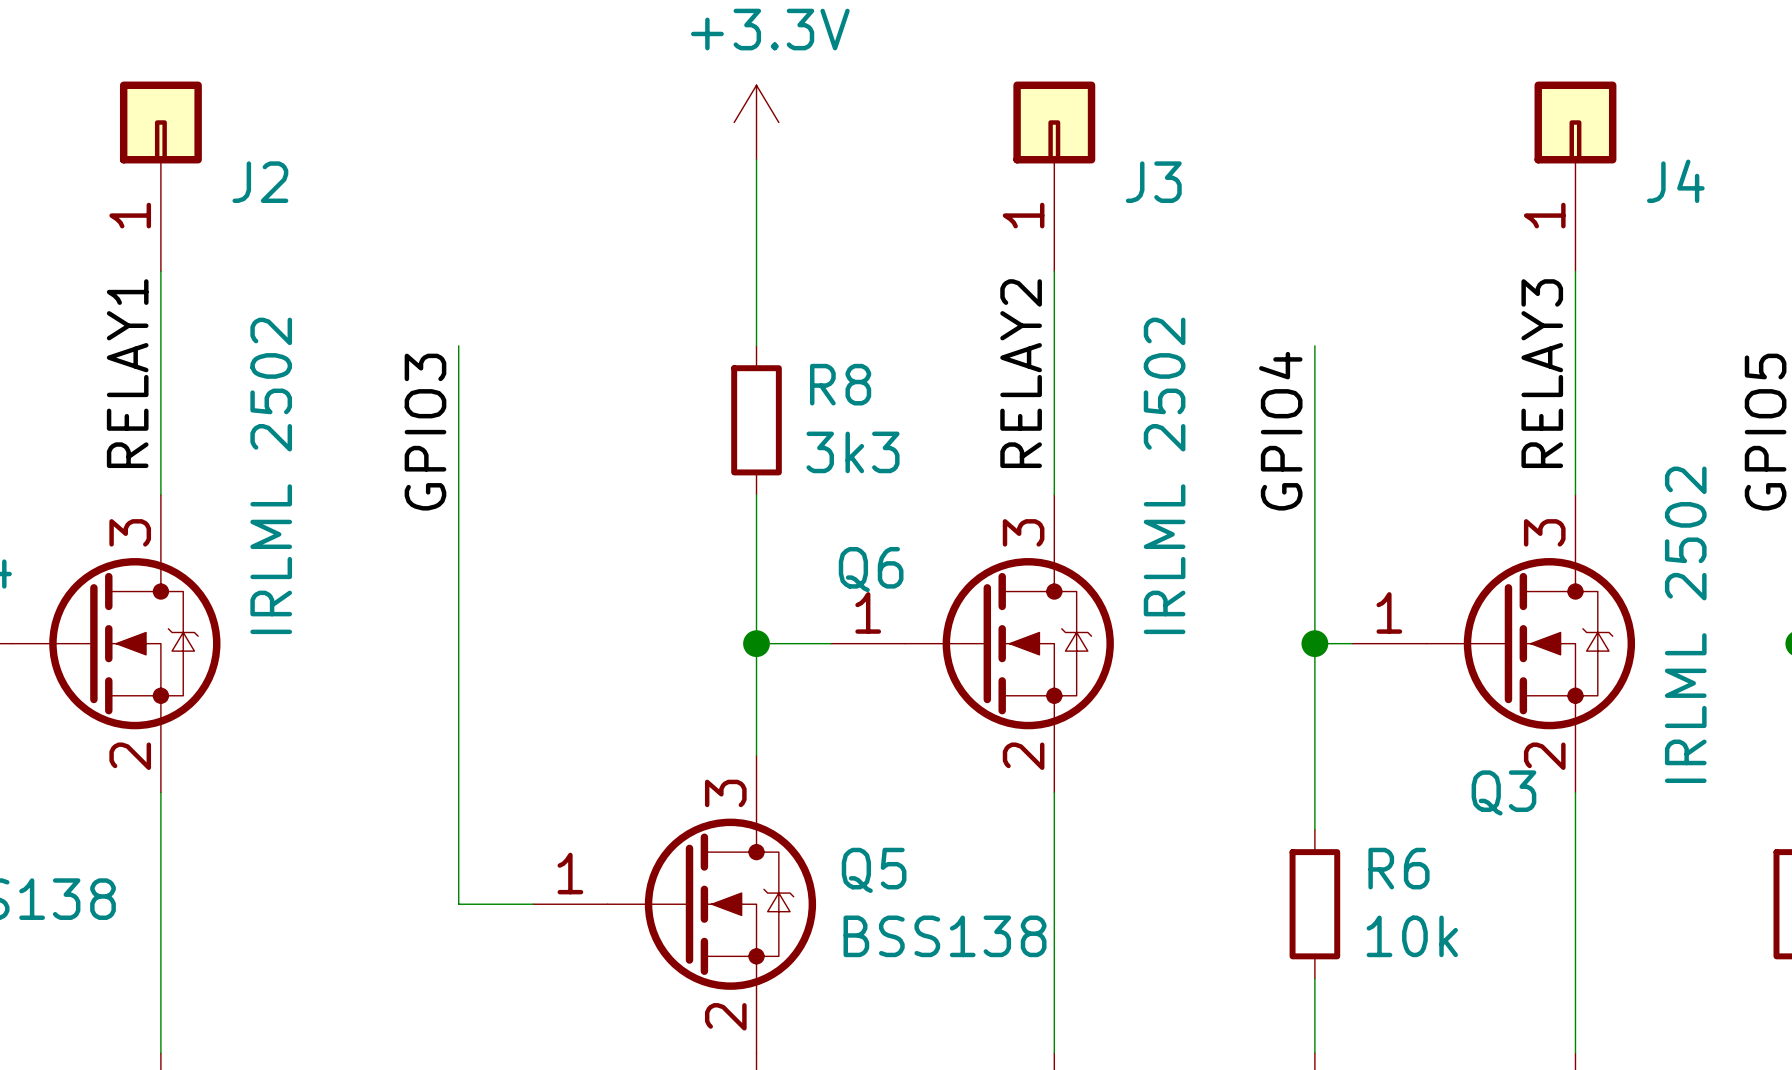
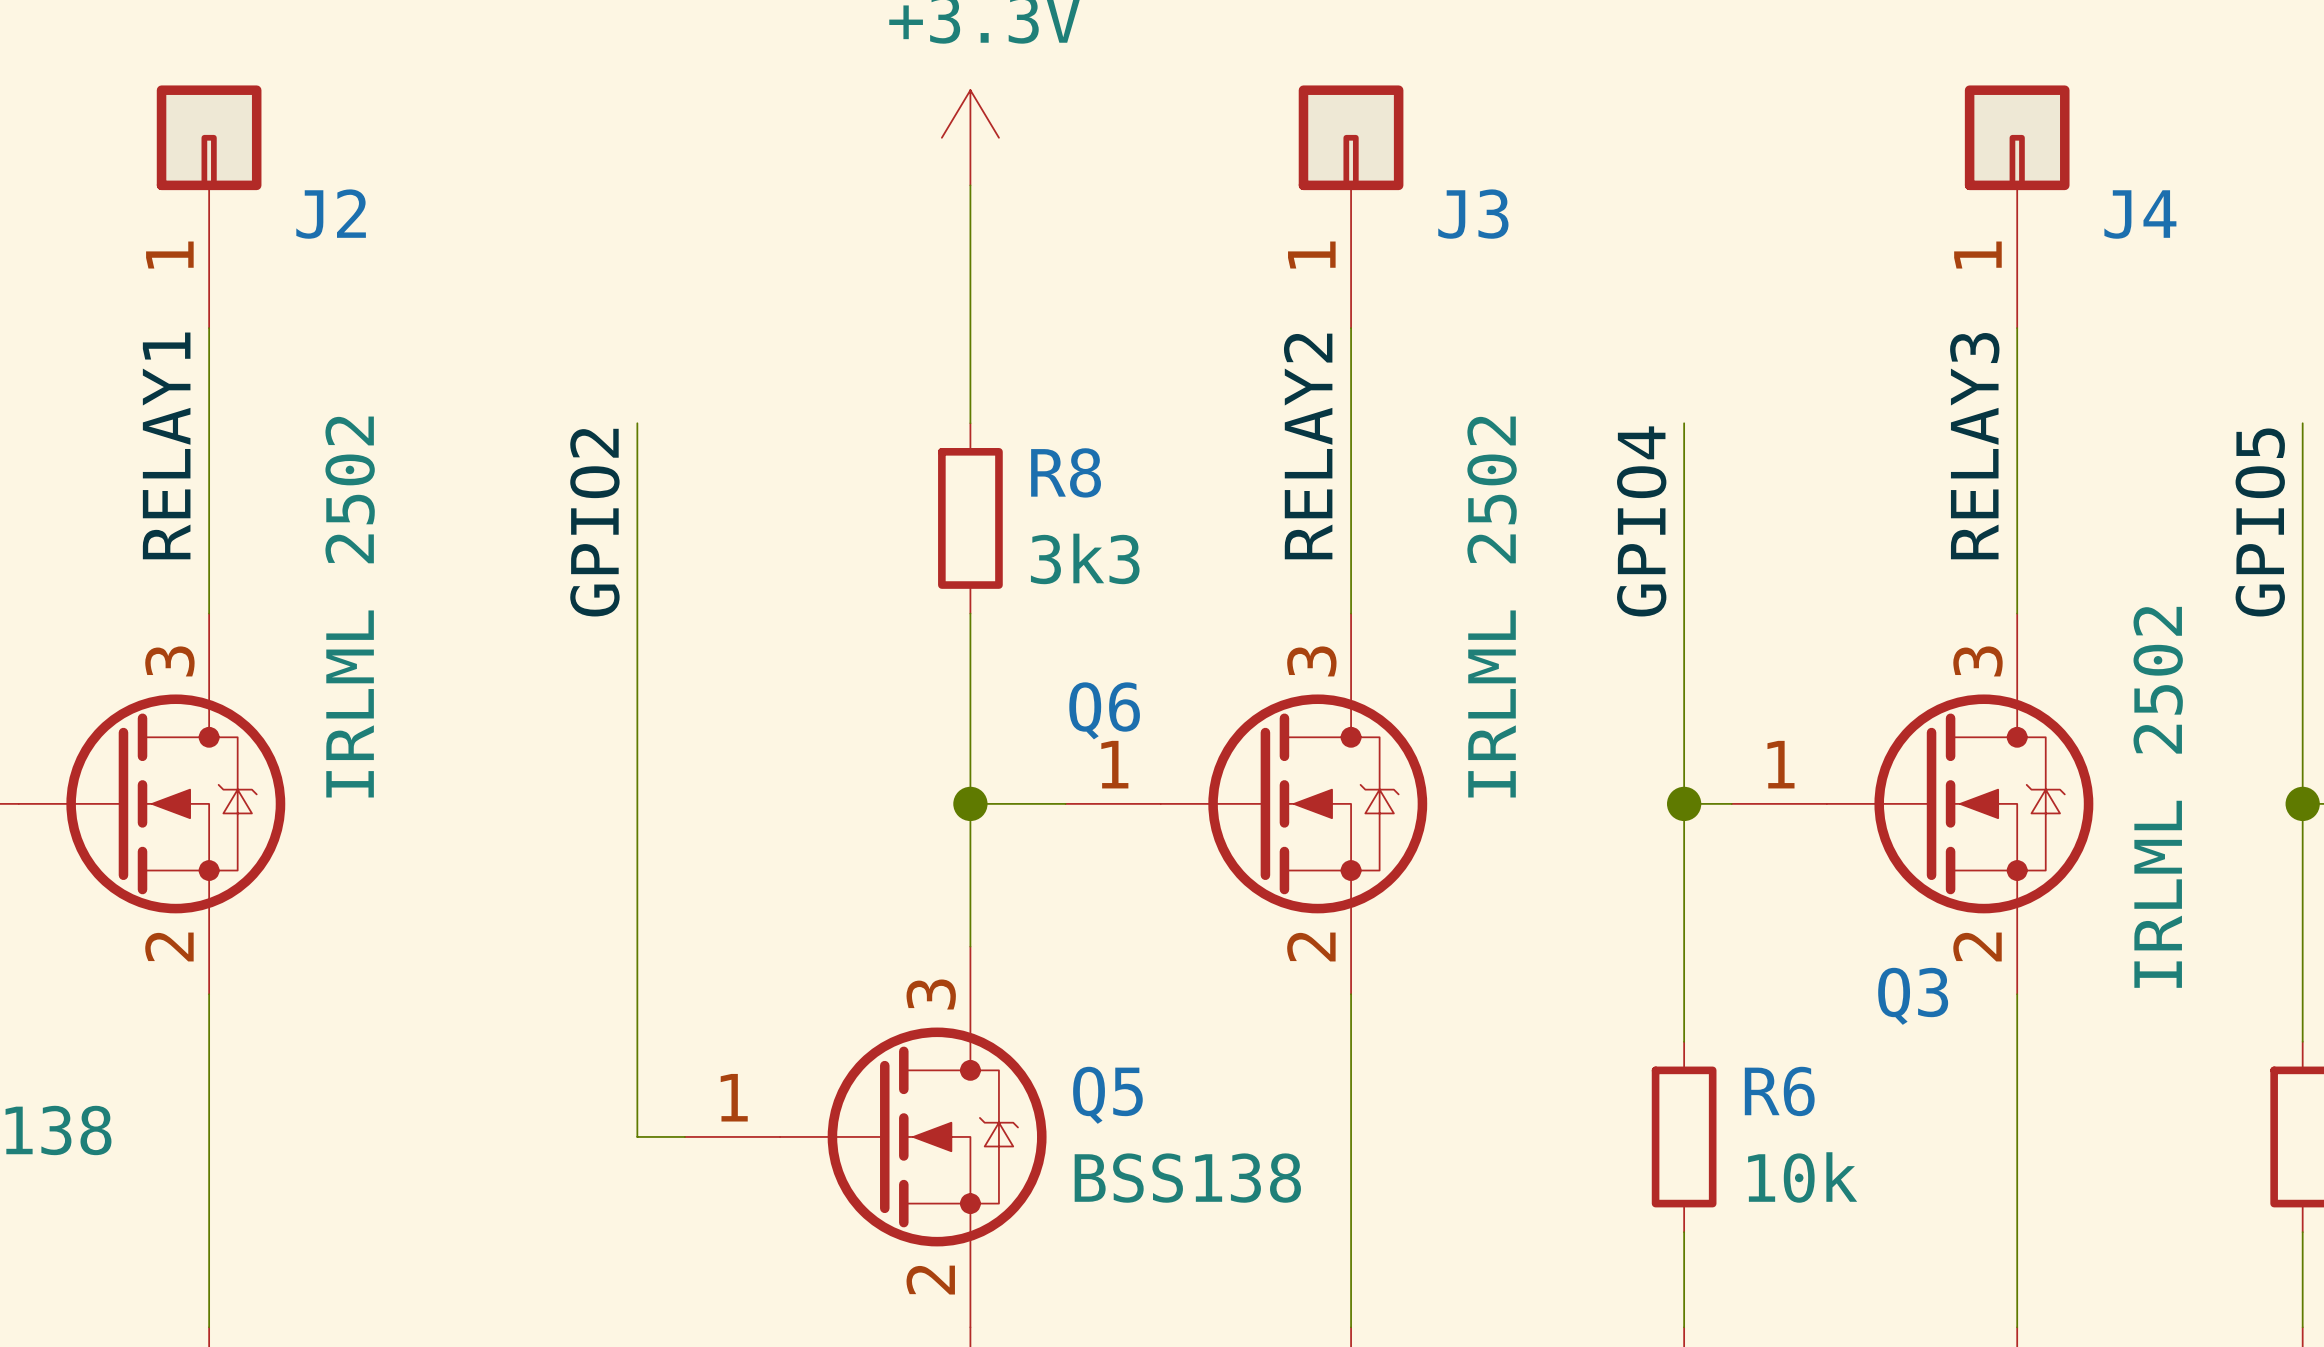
wire: (458, 345) (458, 904) (495, 904) -> (637, 423) (637, 1136)
label: GPIO3 (425, 432) -> GPIO2 (594, 522)

